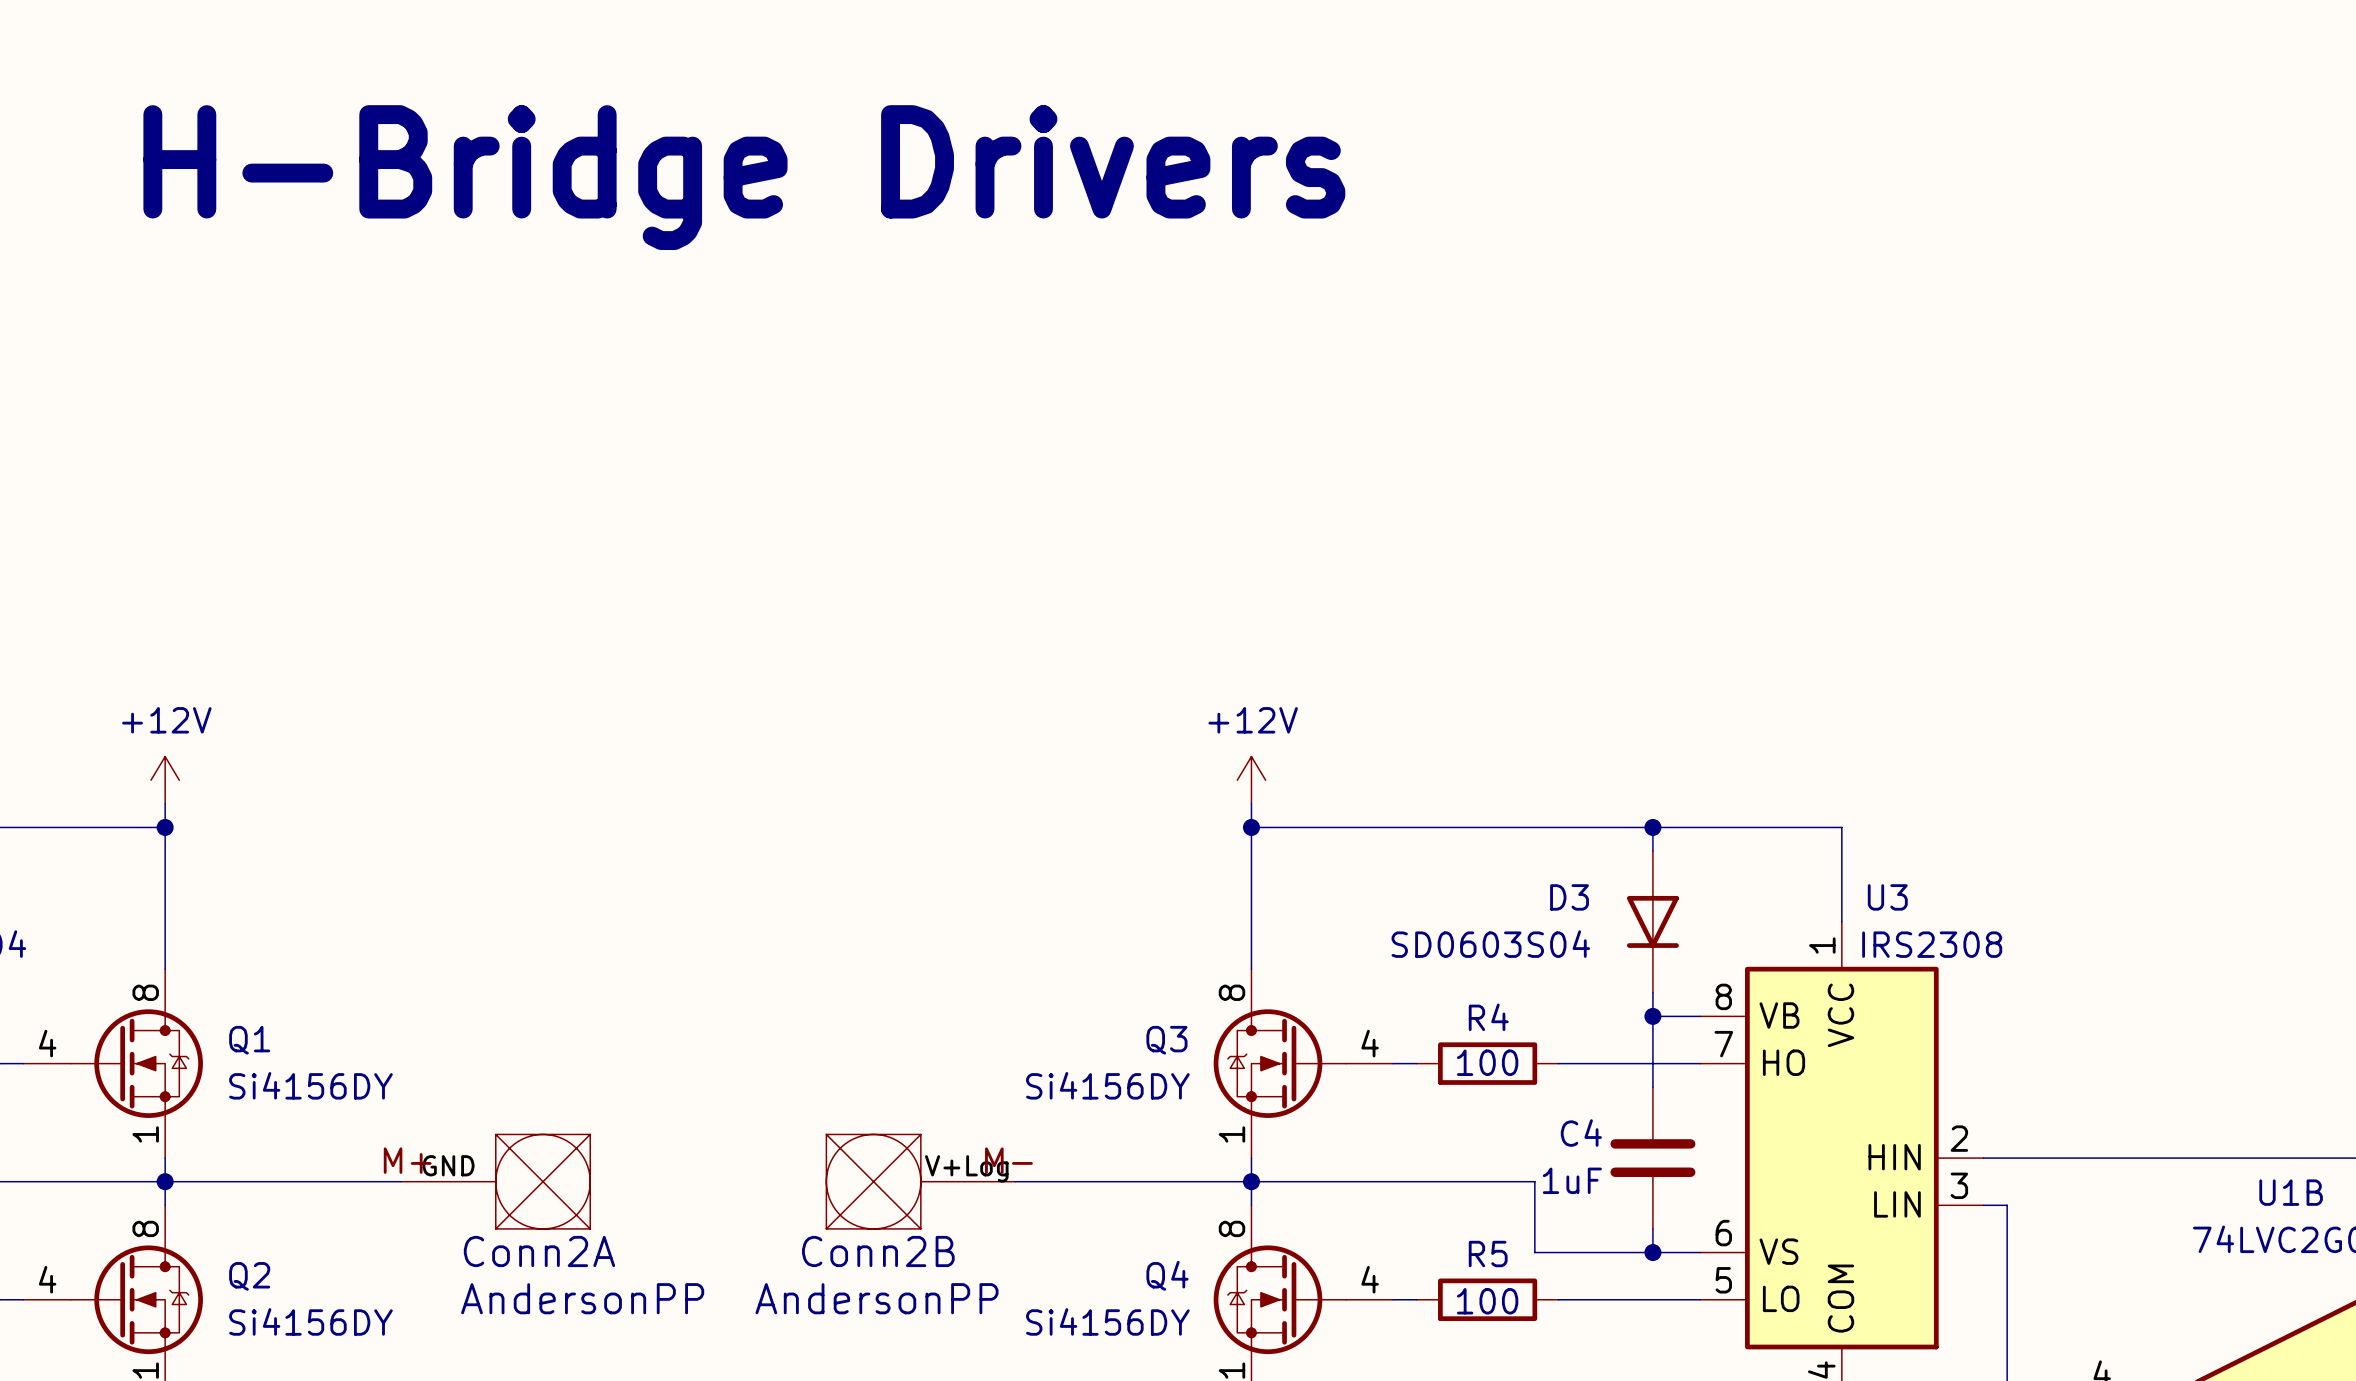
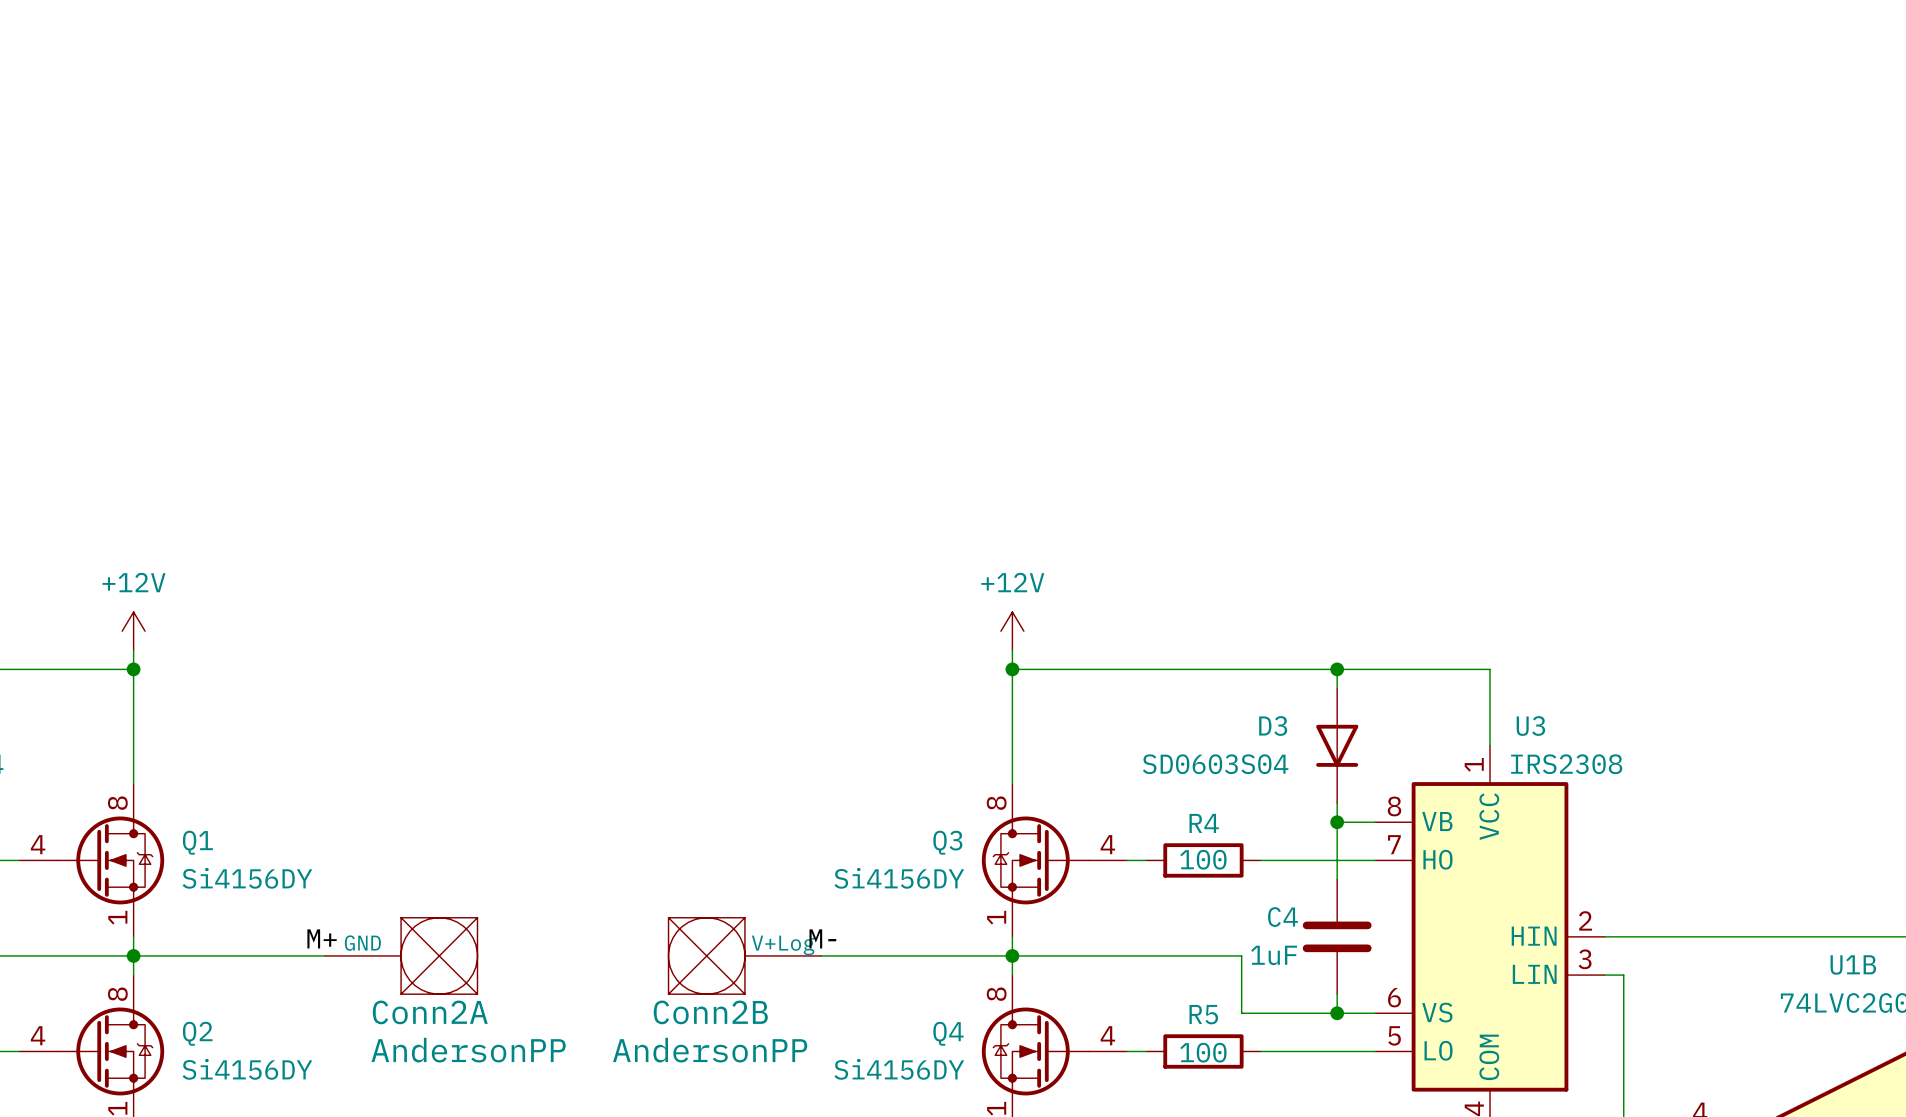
text: H-Bridge Drivers (744, 177) -> none

